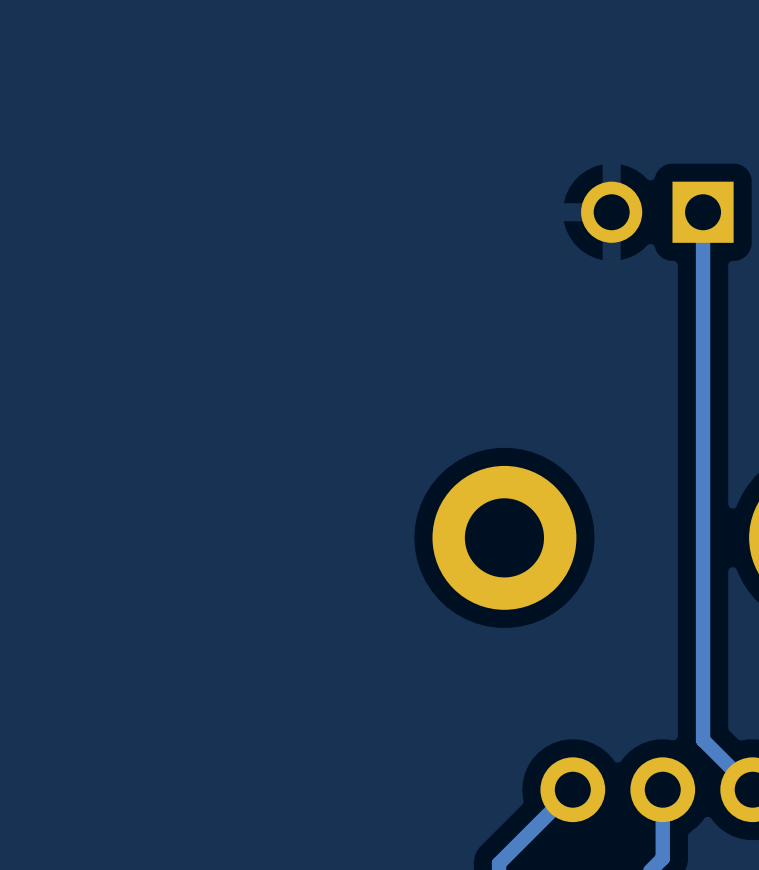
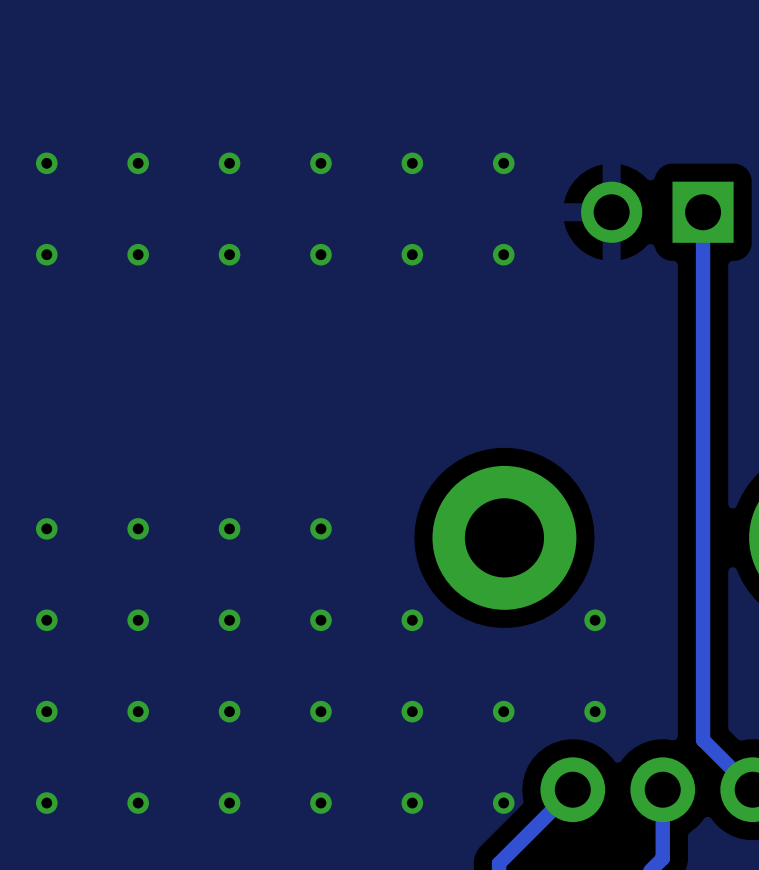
via: none -> (46, 163)
via: none -> (138, 163)
via: none -> (229, 163)
via: none -> (320, 163)
via: none -> (412, 163)
via: none -> (503, 163)
via: none -> (46, 254)
via: none -> (138, 254)
via: none -> (229, 254)
via: none -> (320, 254)
via: none -> (412, 254)
via: none -> (503, 254)
via: none -> (46, 528)
via: none -> (138, 528)
via: none -> (229, 528)
via: none -> (320, 528)
via: none -> (46, 620)
via: none -> (138, 620)
via: none -> (229, 620)
via: none -> (320, 620)
via: none -> (412, 620)
via: none -> (595, 620)
via: none -> (46, 711)
via: none -> (138, 711)
via: none -> (229, 711)
via: none -> (320, 711)
via: none -> (412, 711)
via: none -> (503, 711)
via: none -> (595, 711)
via: none -> (46, 803)
via: none -> (138, 803)
via: none -> (229, 803)
via: none -> (320, 803)
via: none -> (412, 803)
via: none -> (503, 803)

